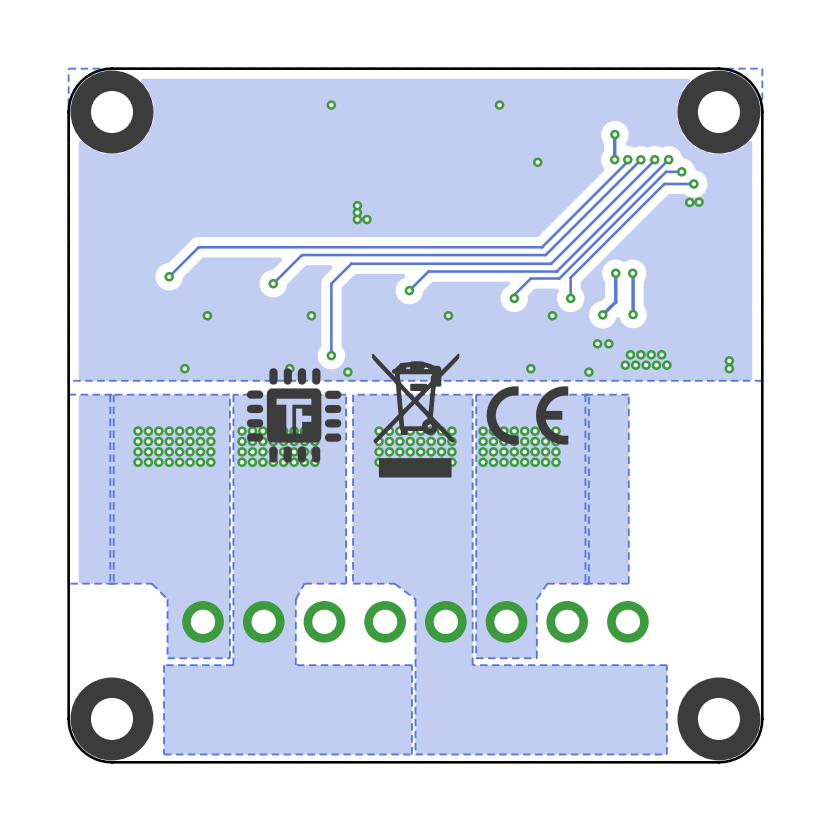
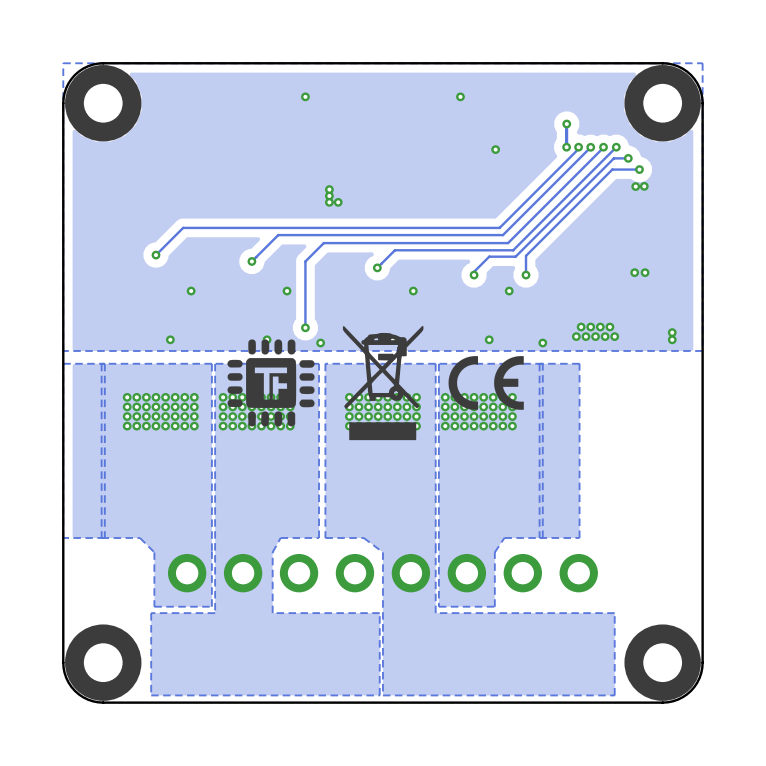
track: (615, 273) (615, 301) (602, 314) -> none
via: (615, 273) -> none
track: (632, 273) (633, 314) -> none
via: (632, 273) -> none
via: none -> (634, 272)
via: none -> (645, 272)
via: (602, 314) -> none
via: (633, 314) -> none
via: (597, 343) -> none
via: (608, 343) -> none

